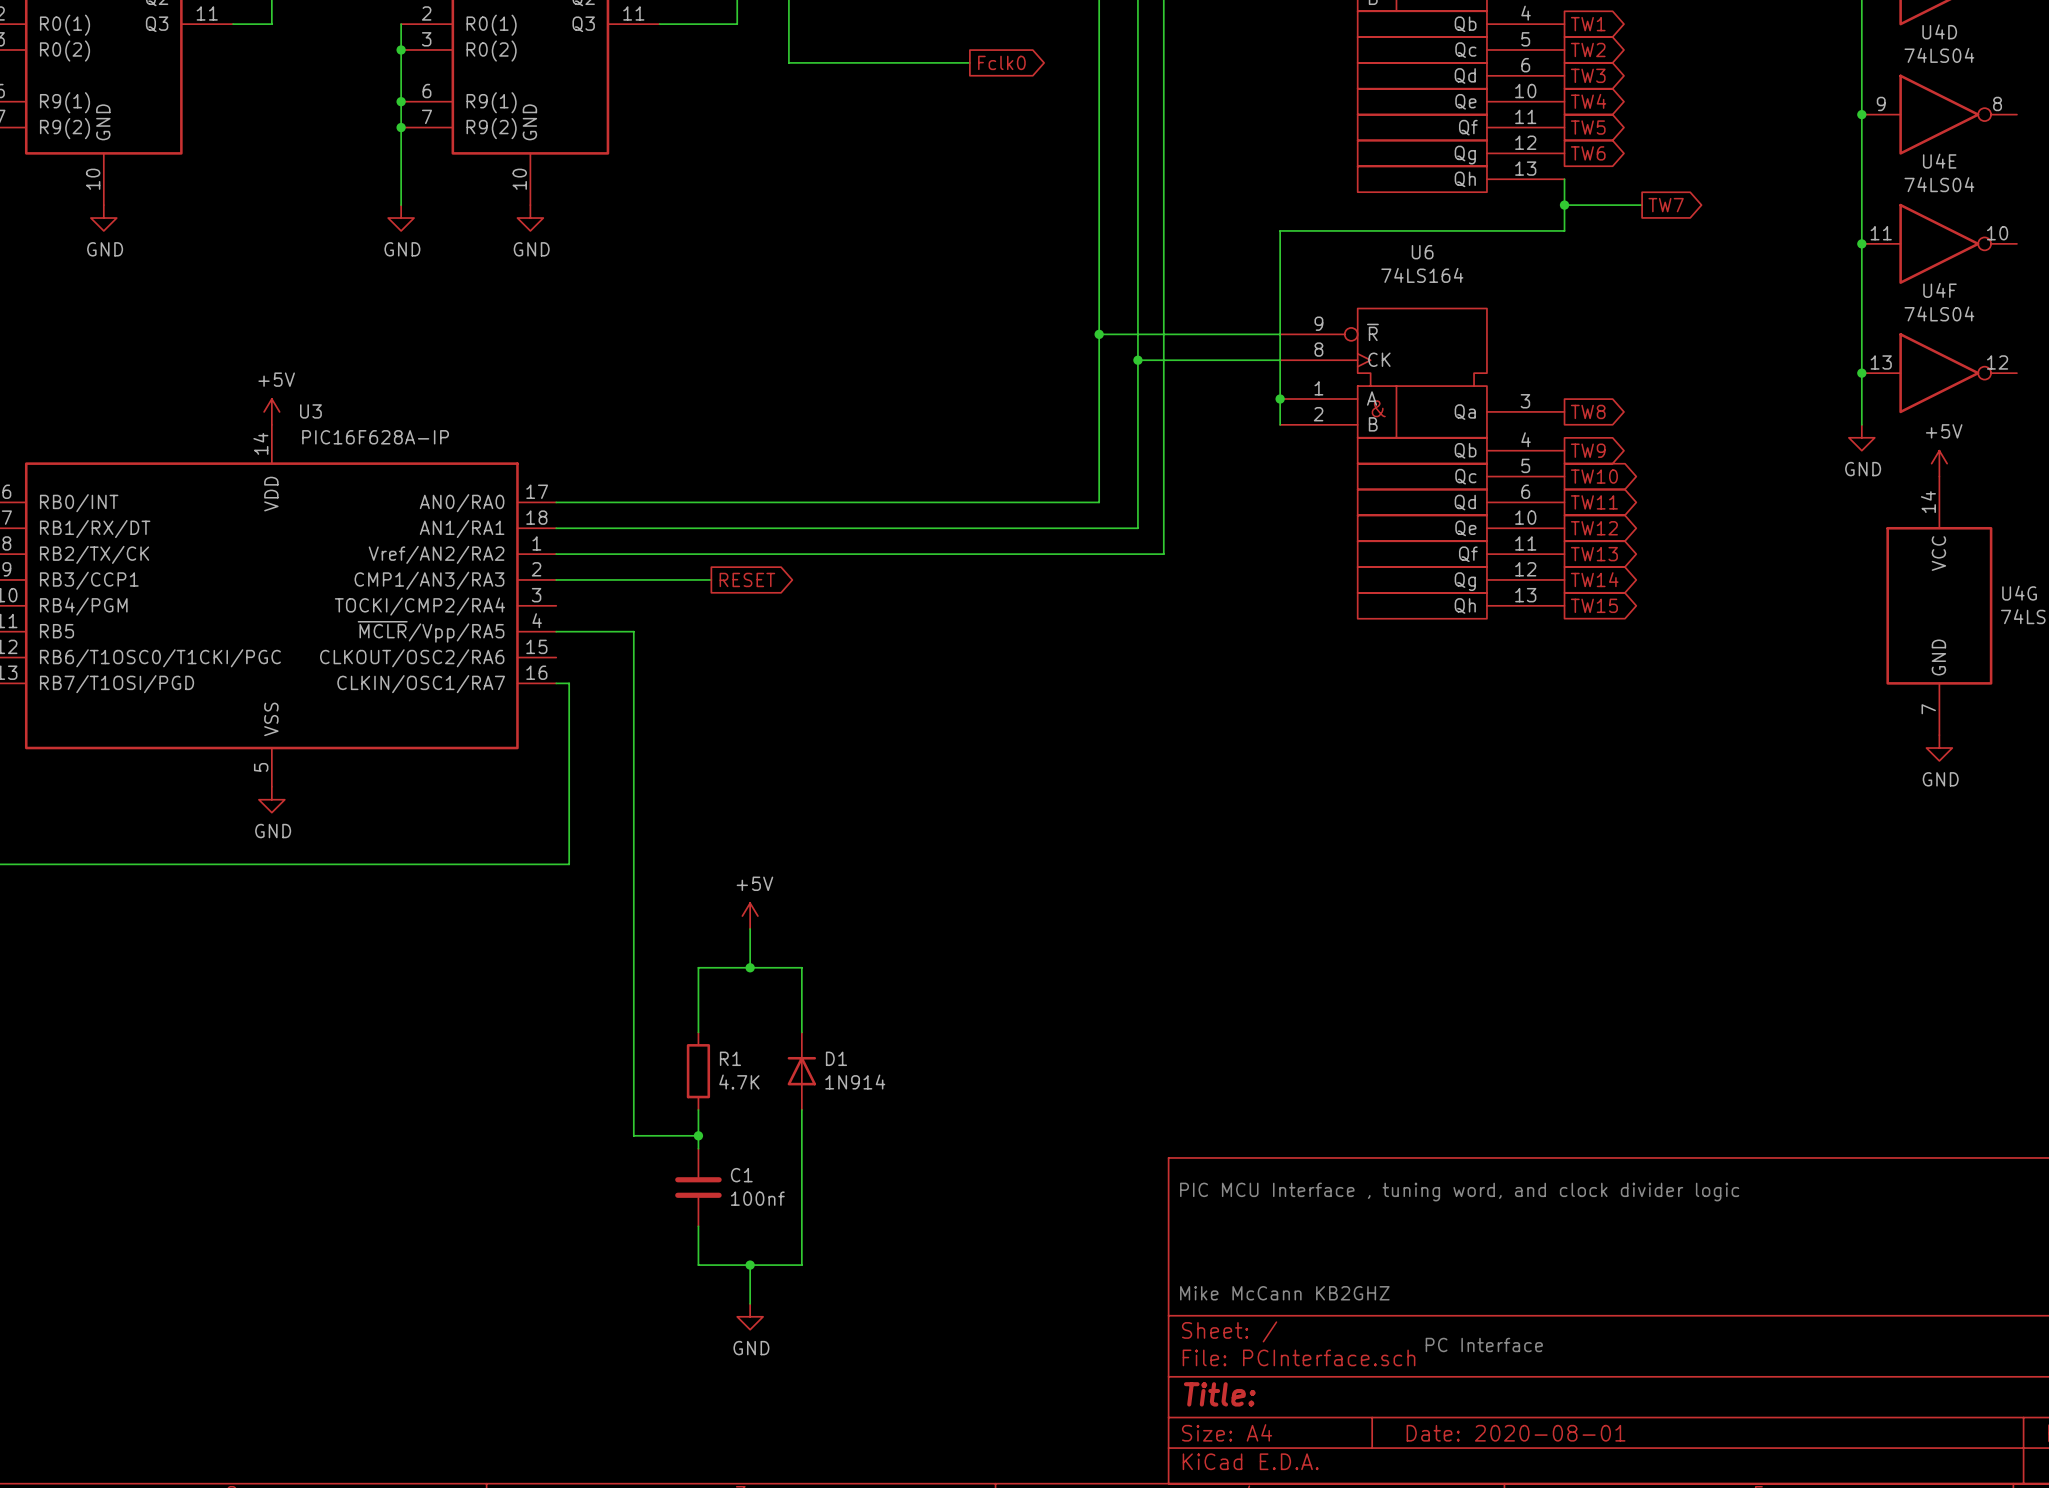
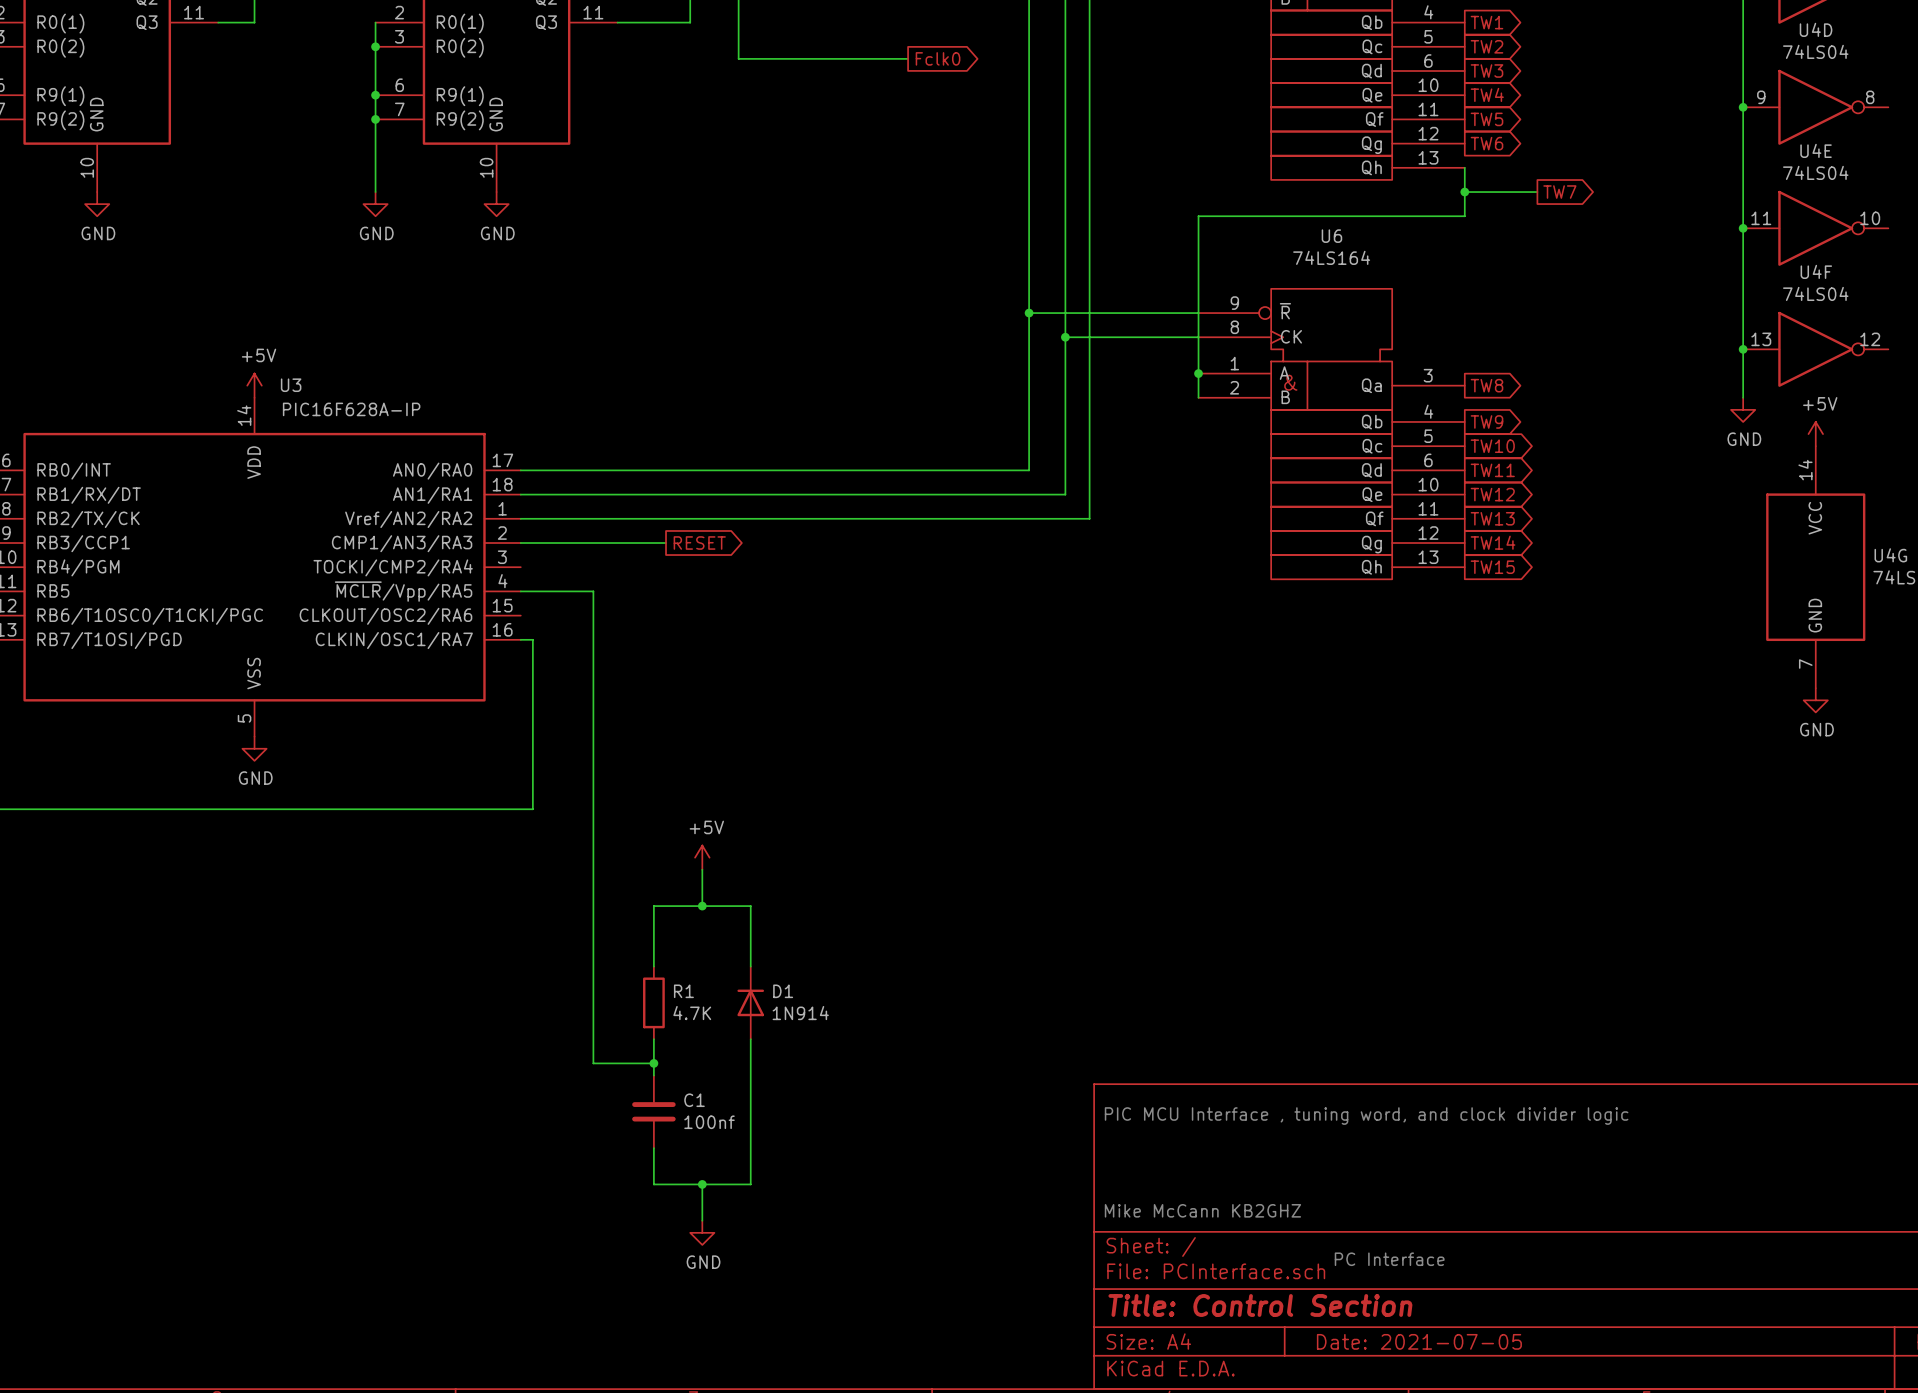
title block: Title: (1219, 1394) -> Title: Control Section (1260, 1305)
title block: Date: 2020-08-01 (1516, 1433) -> Date: 2021-07-05 (1419, 1341)

